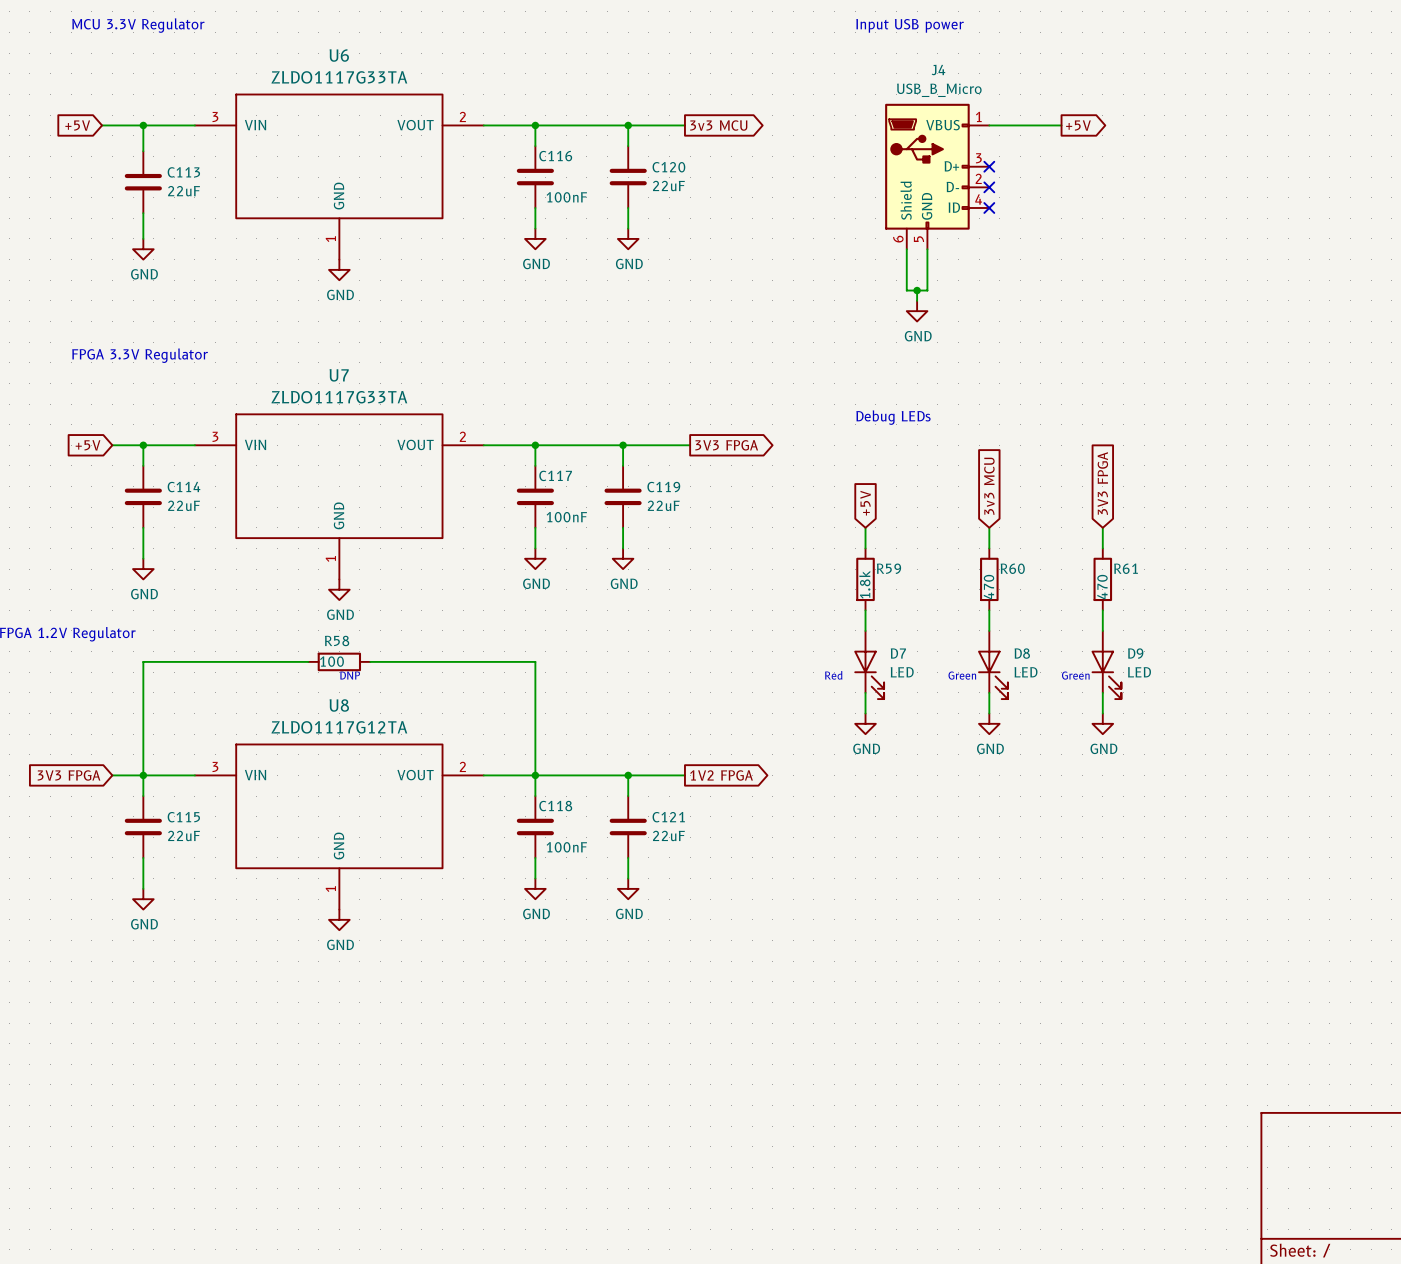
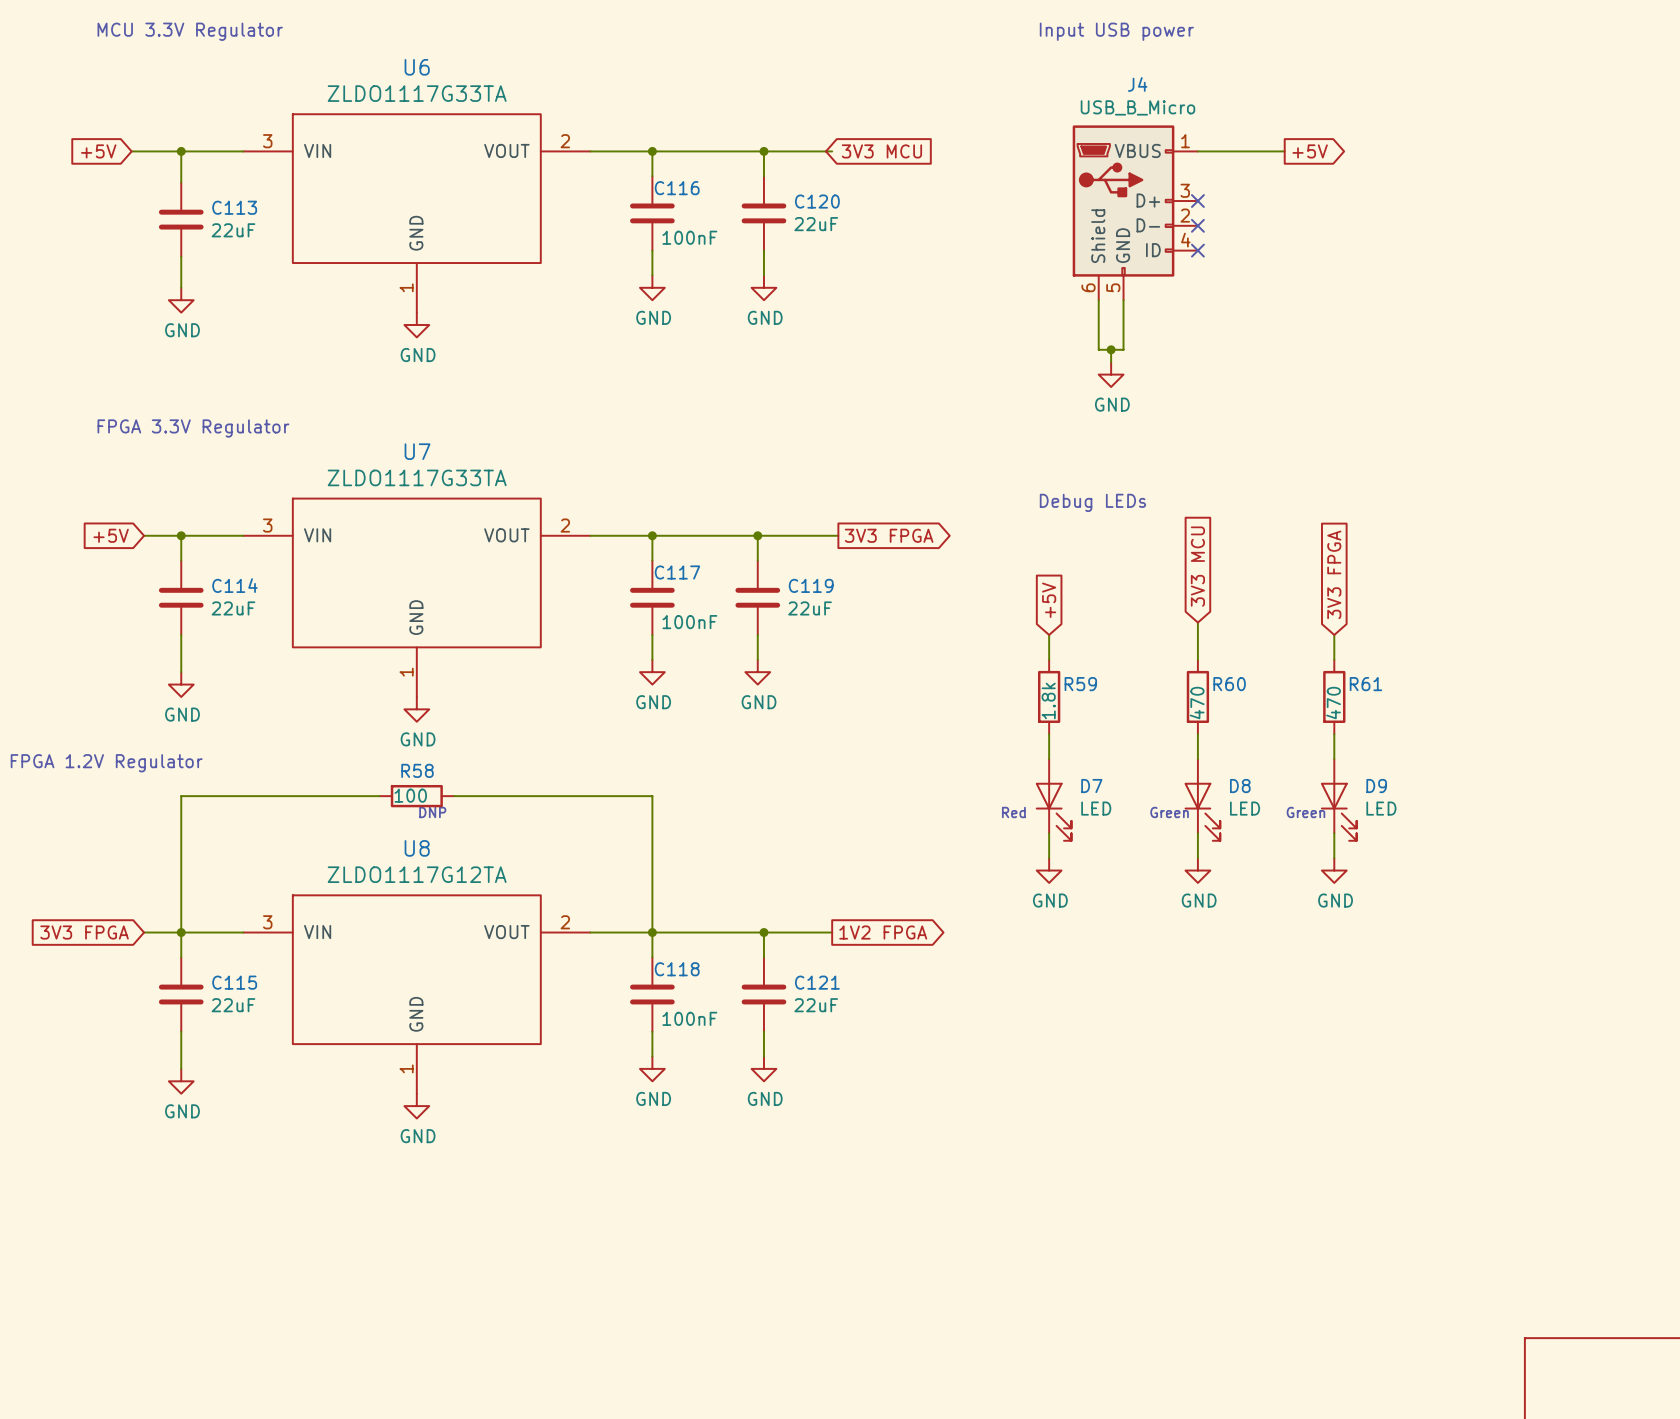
global label shape: output (718, 125) -> input (881, 151)
global label: 3v3 MCU (718, 125) -> 3V3 MCU (881, 151)
global label: 3v3 MCU (989, 486) -> 3V3 MCU (1197, 566)
wire: none -> (1197, 622) (1197, 634)

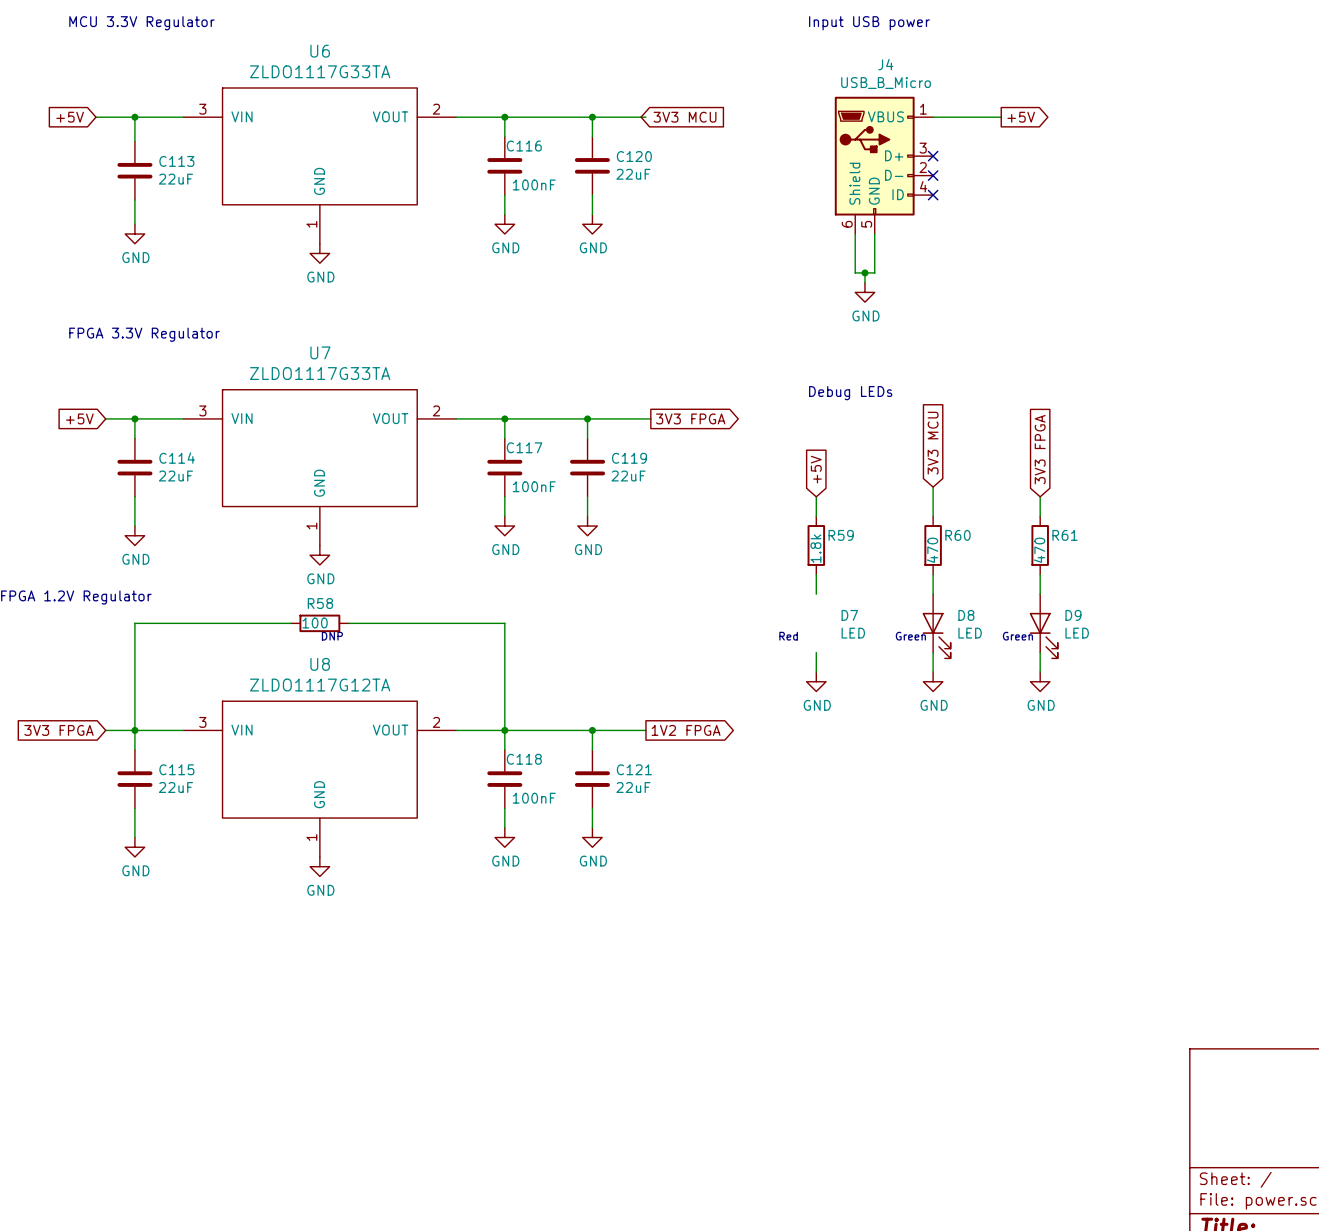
D7 symbol: [1035, 758, 1072, 841] -> [841, 609, 866, 639]

